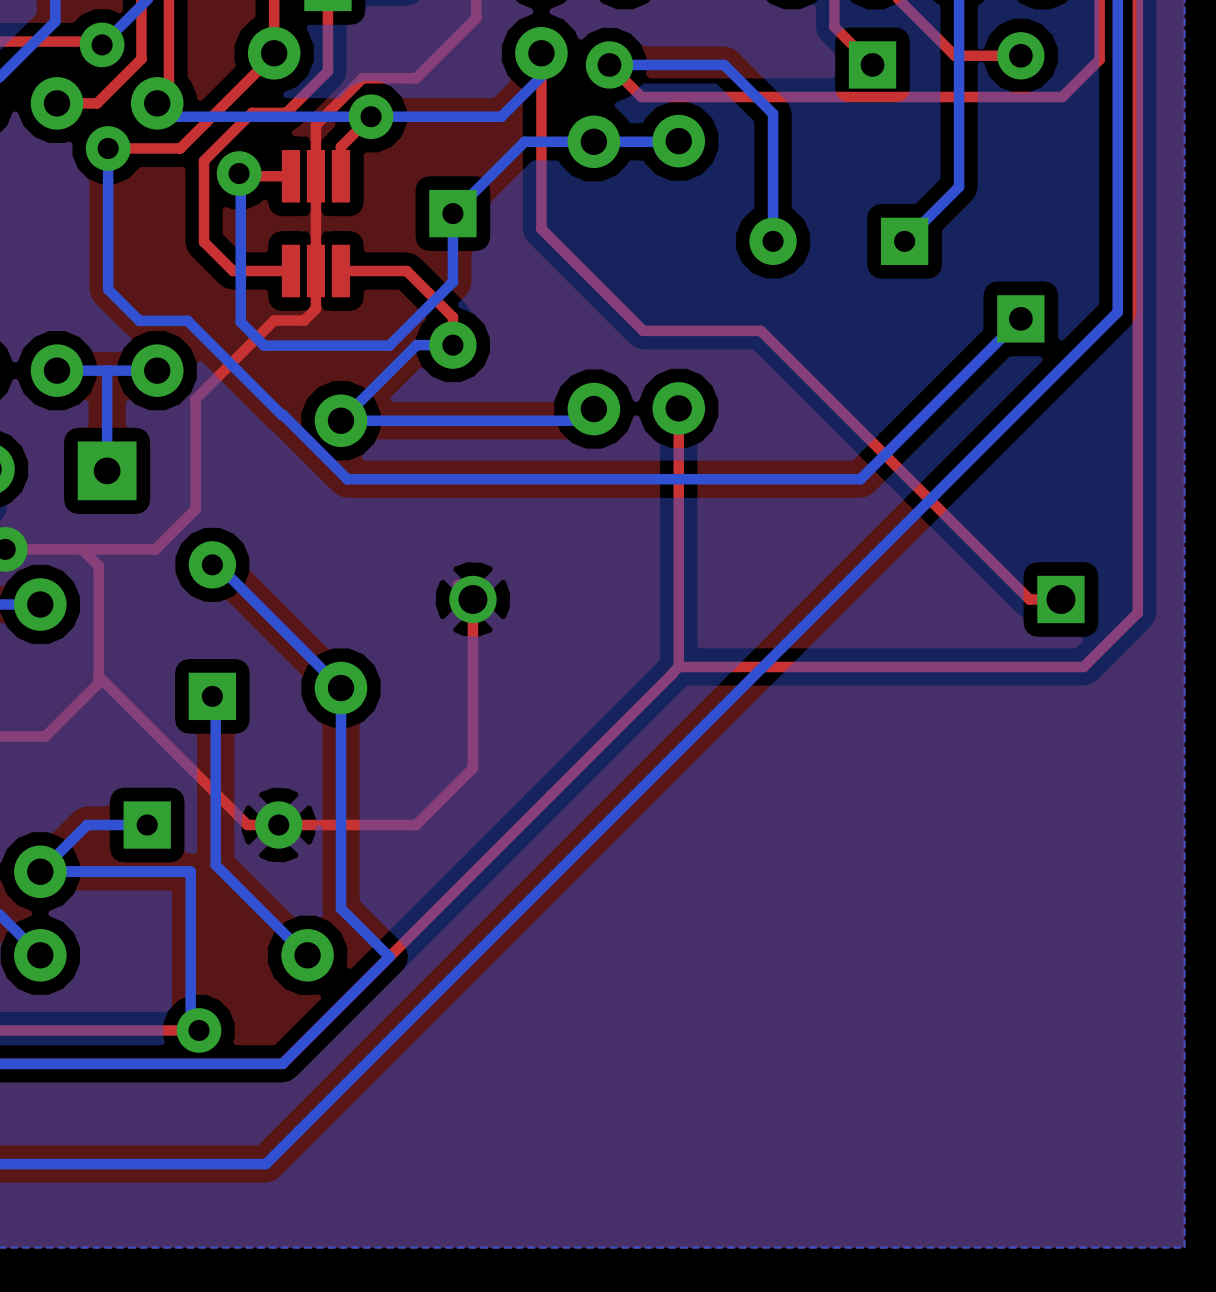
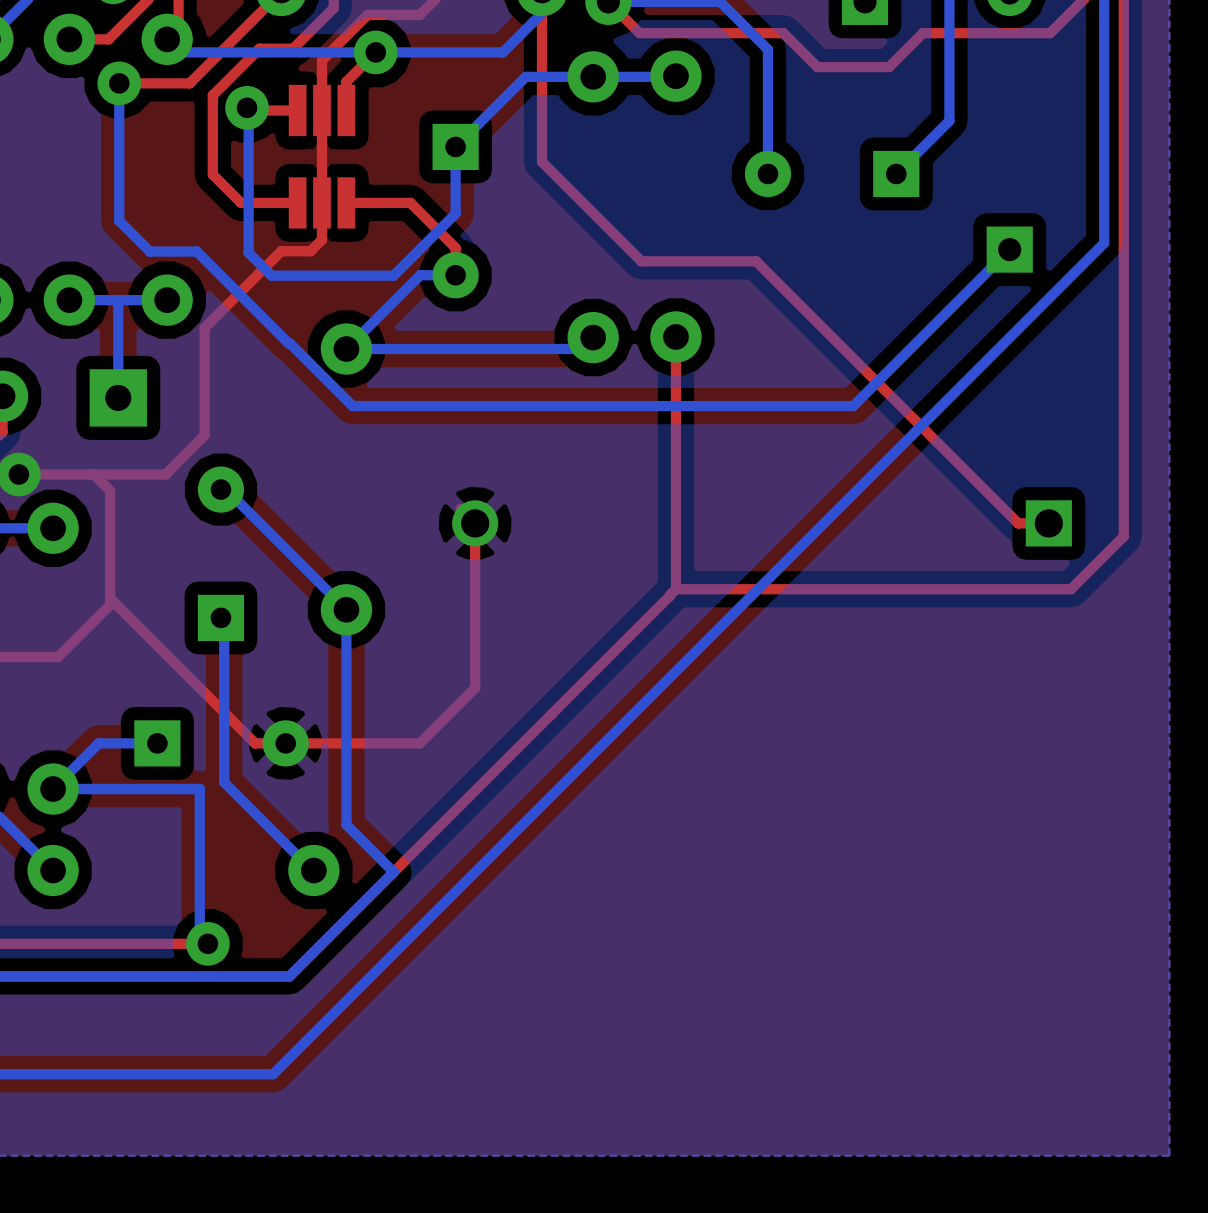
top track: (931, 97) (789, 97) -> (923, 33) (889, 67) (817, 67) (783, 33)

